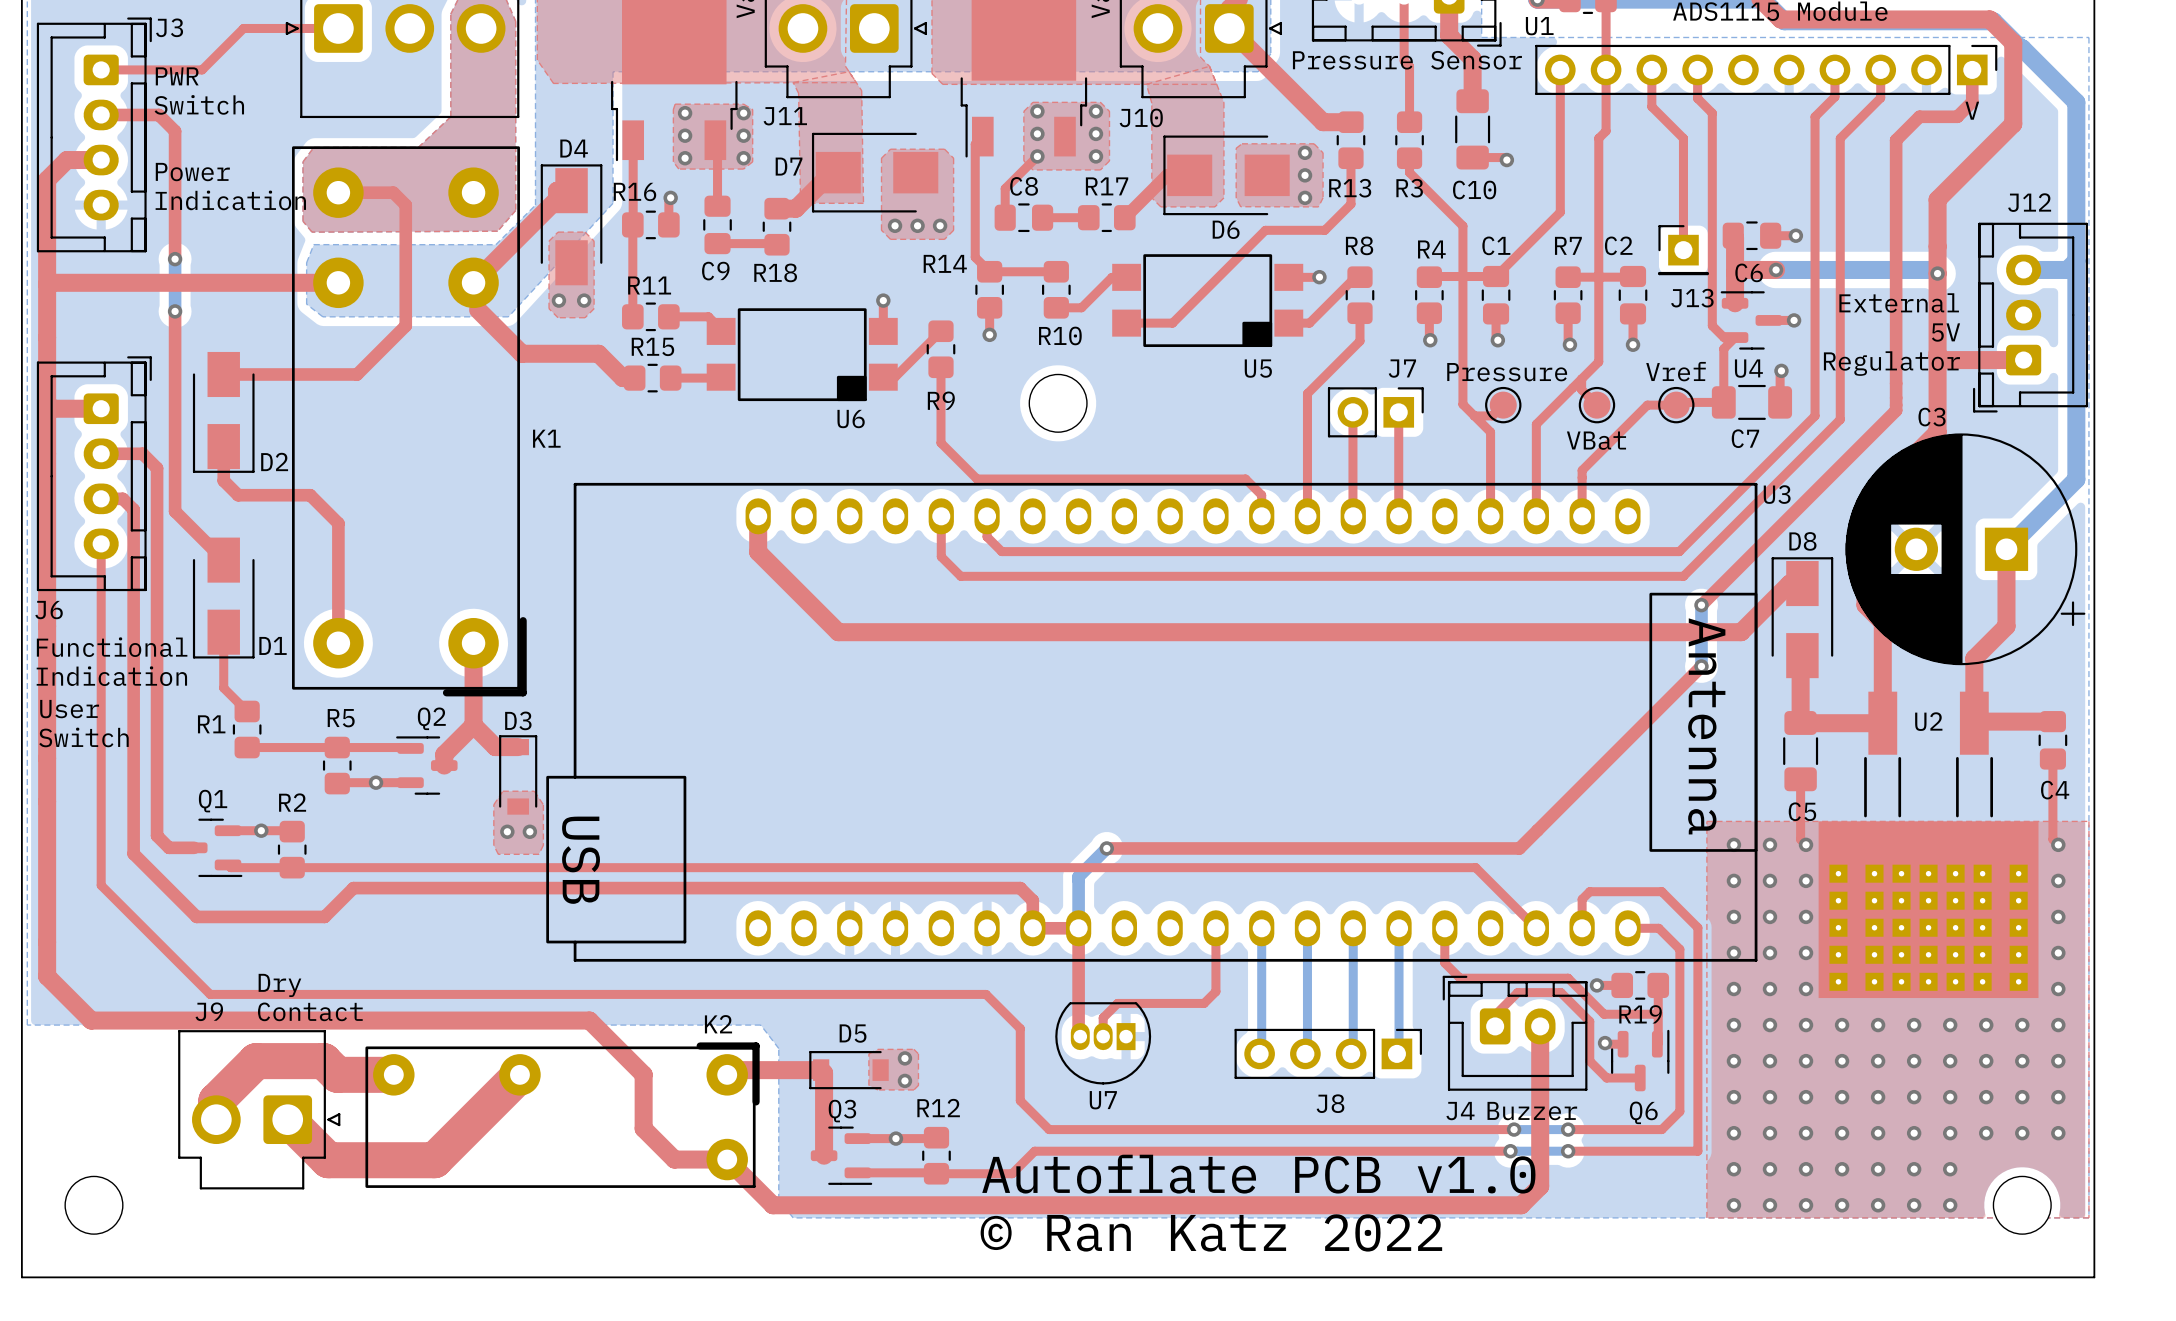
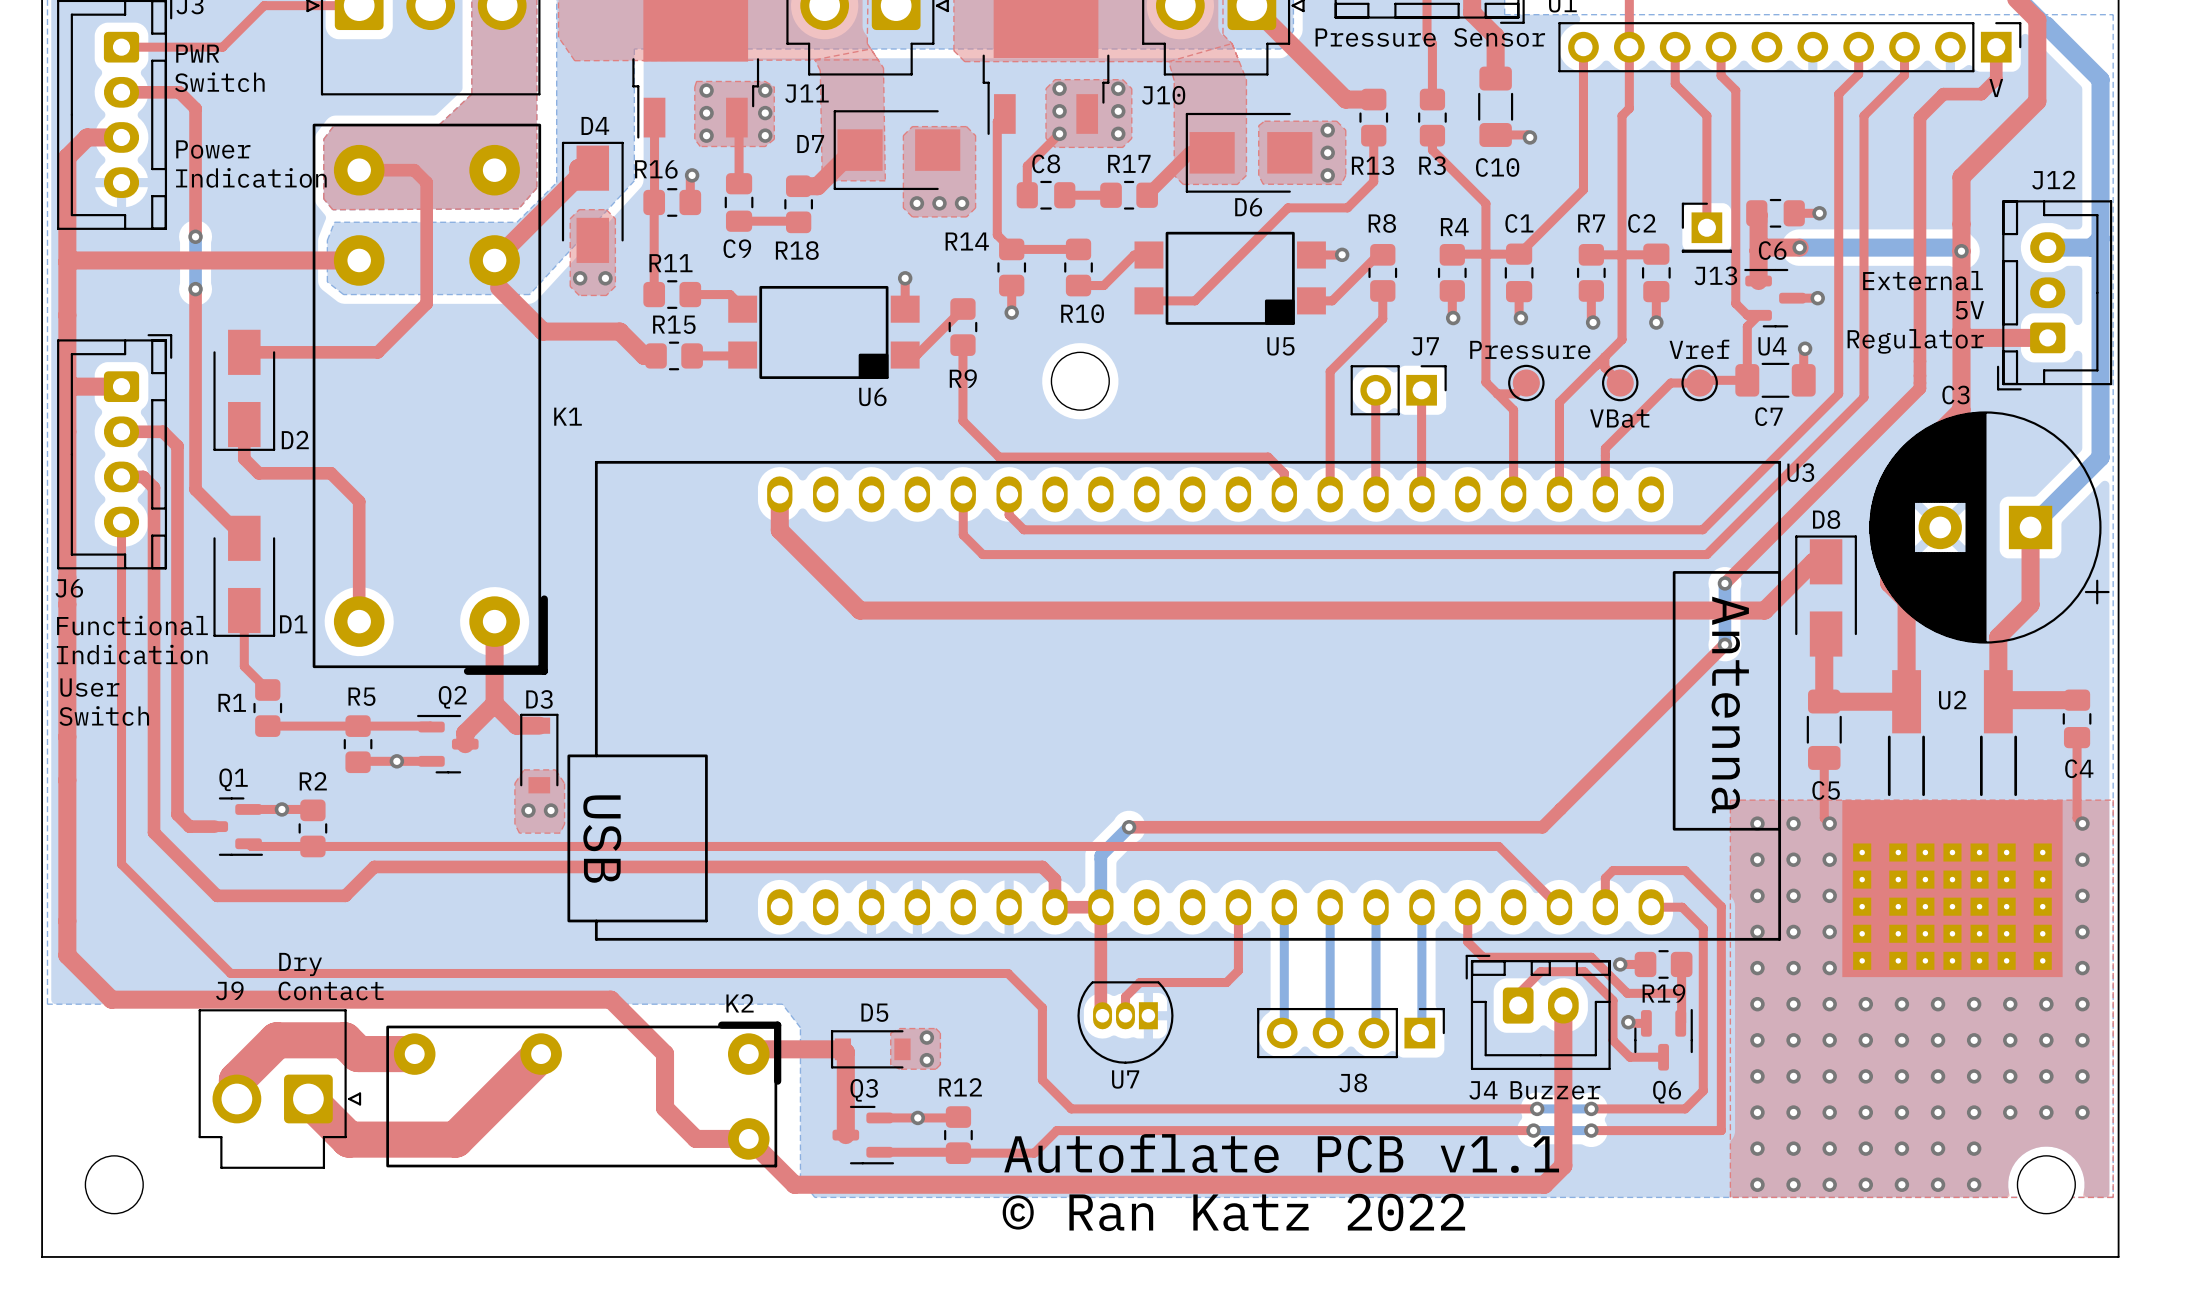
text: Autoflate PCB v1.0 (1258, 1174) -> Autoflate PCB v1.1 (1281, 1153)

